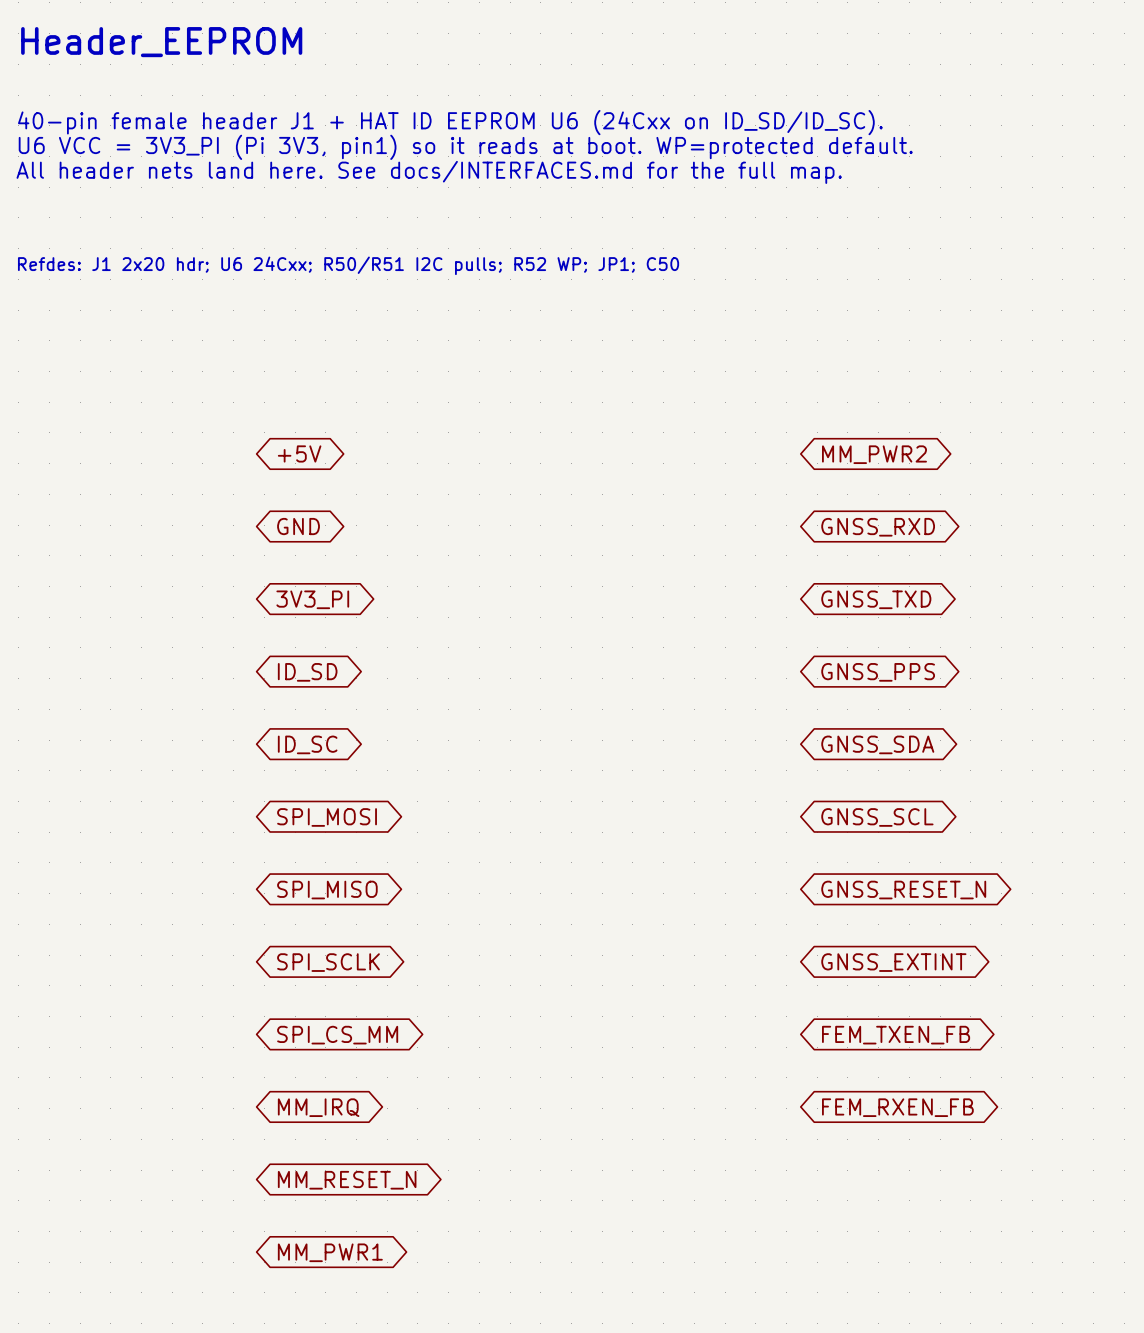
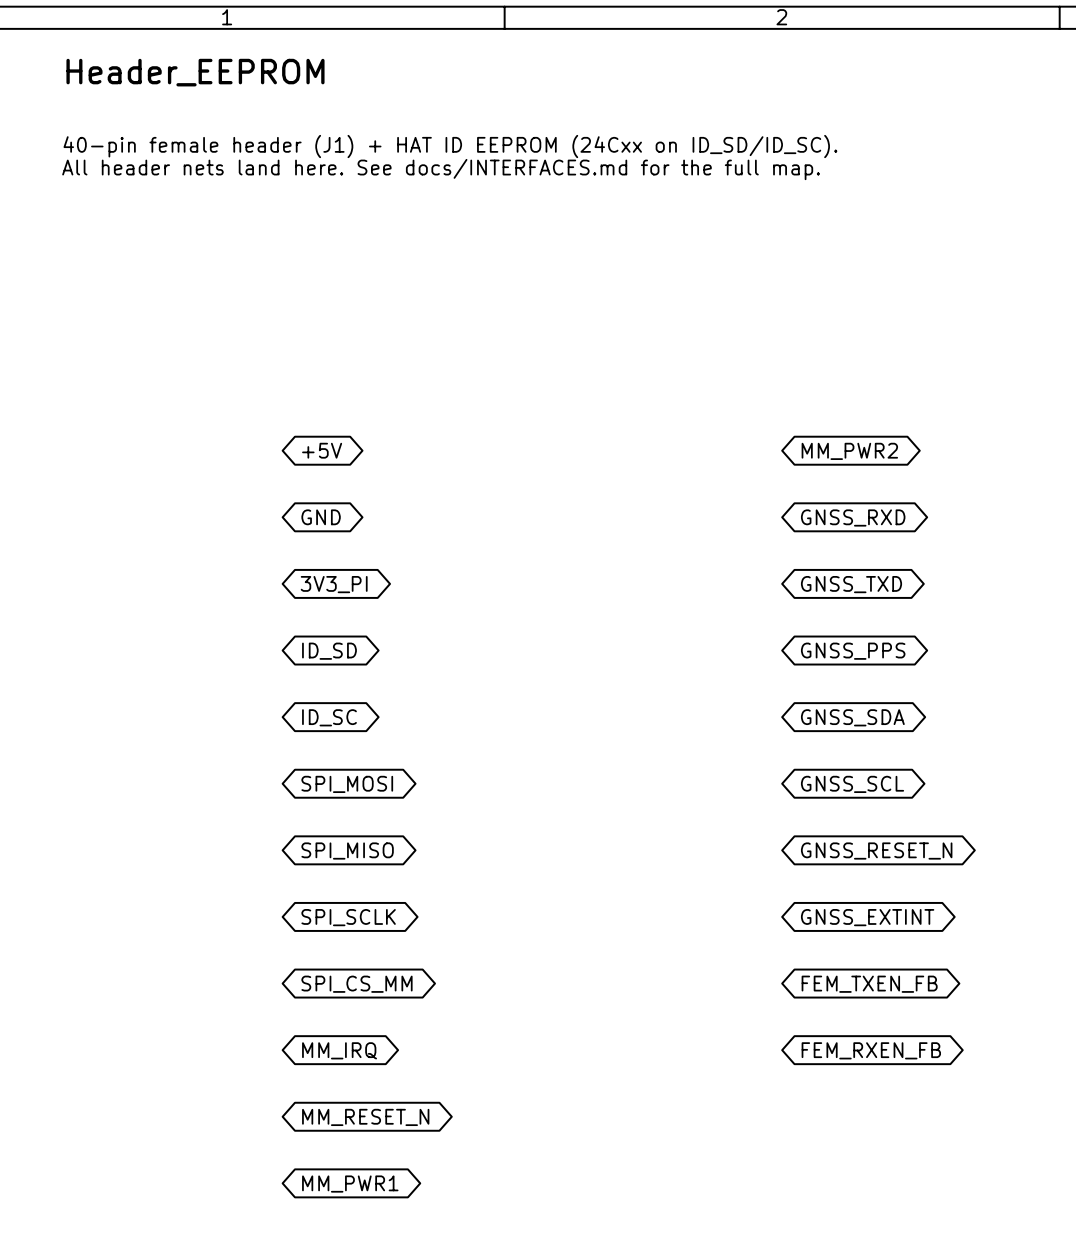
text: 40-pin female header J1 + HAT ID EEPROM U6 (24Cxx on ID_SD/ID_SC). (450, 122) -> 40-pin female header (J1) + HAT ID EEPROM (24Cxx on ID_SD/ID_SC). (450, 146)
text: U6 VCC = 3V3_PI (Pi 3V3, pin1) so it reads at boot. WP=protected default. (465, 147) -> All header nets land here. See docs/INTERFACES.md for the full map. (441, 169)
text: All header nets land here. See docs/INTERFACES.md for the full map. (429, 172) -> none
text: Refdes: J1 2x20 hdr; U6 24Cxx; R50/R51 I2C pulls; R52 WP; JP1; C50 (348, 265) -> none

